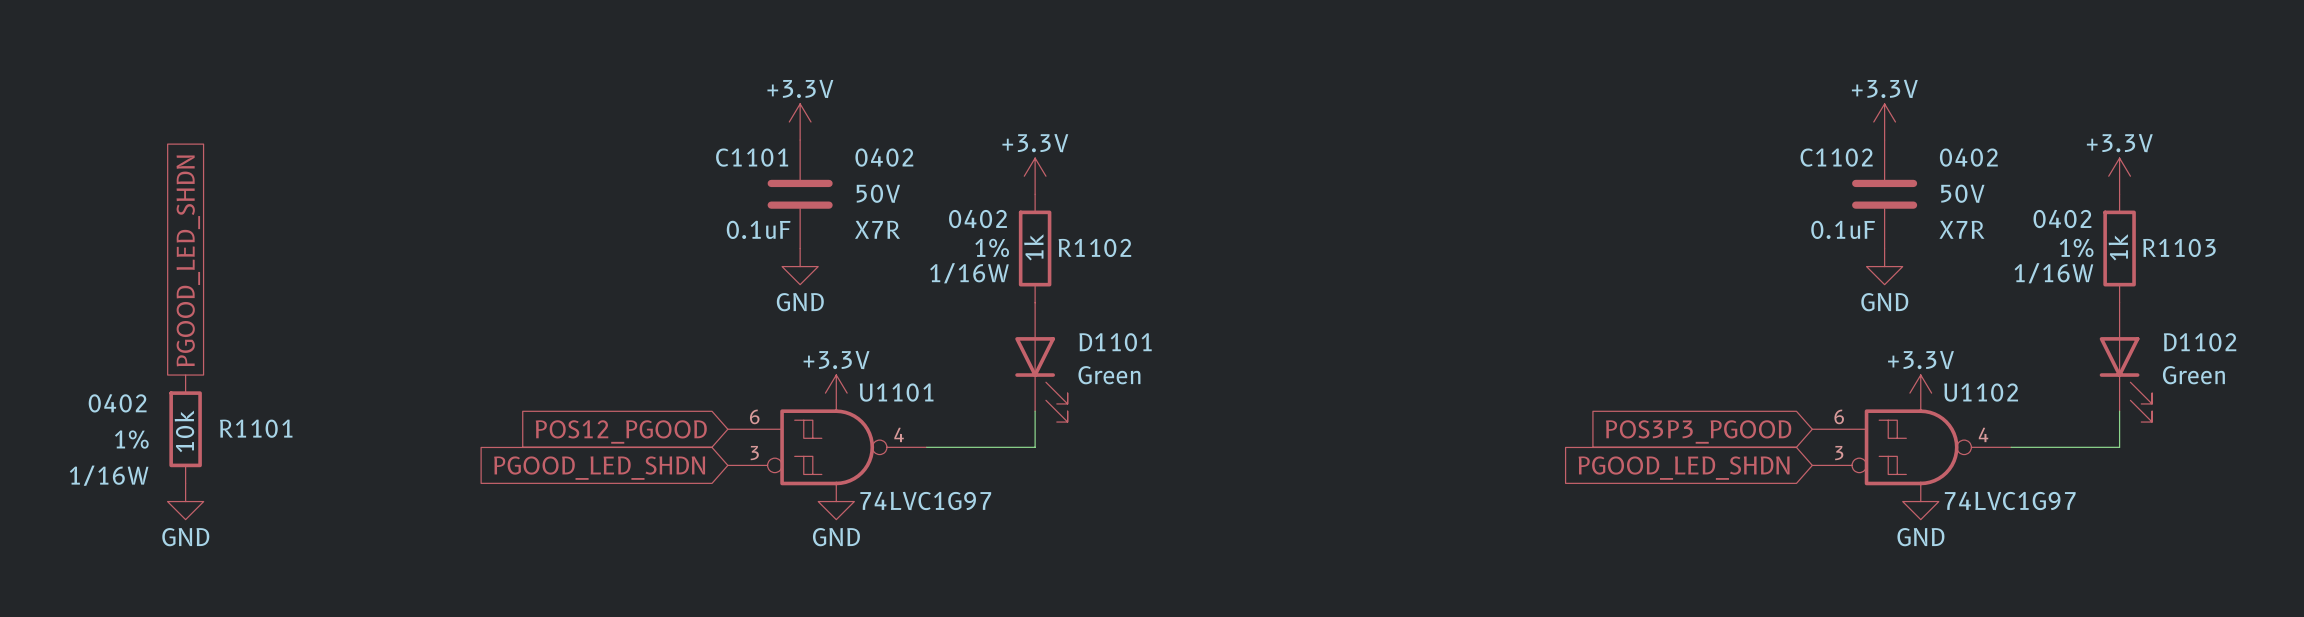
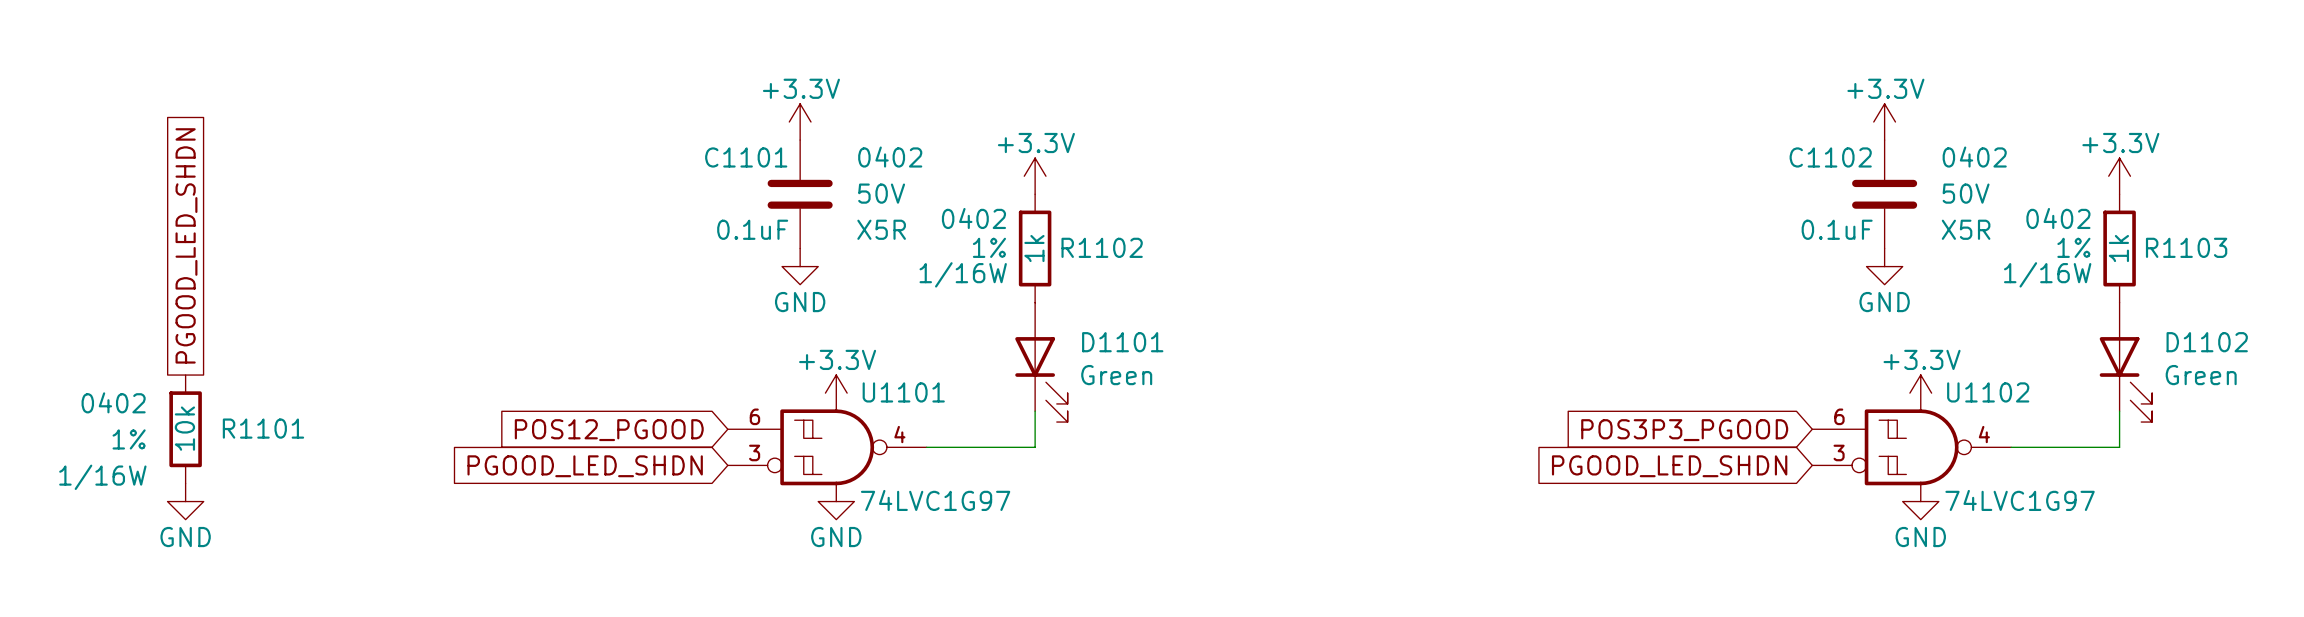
C1101 text: X7R (877, 229) -> X5R (881, 229)
C1102 text: X7R (1961, 229) -> X5R (1966, 229)

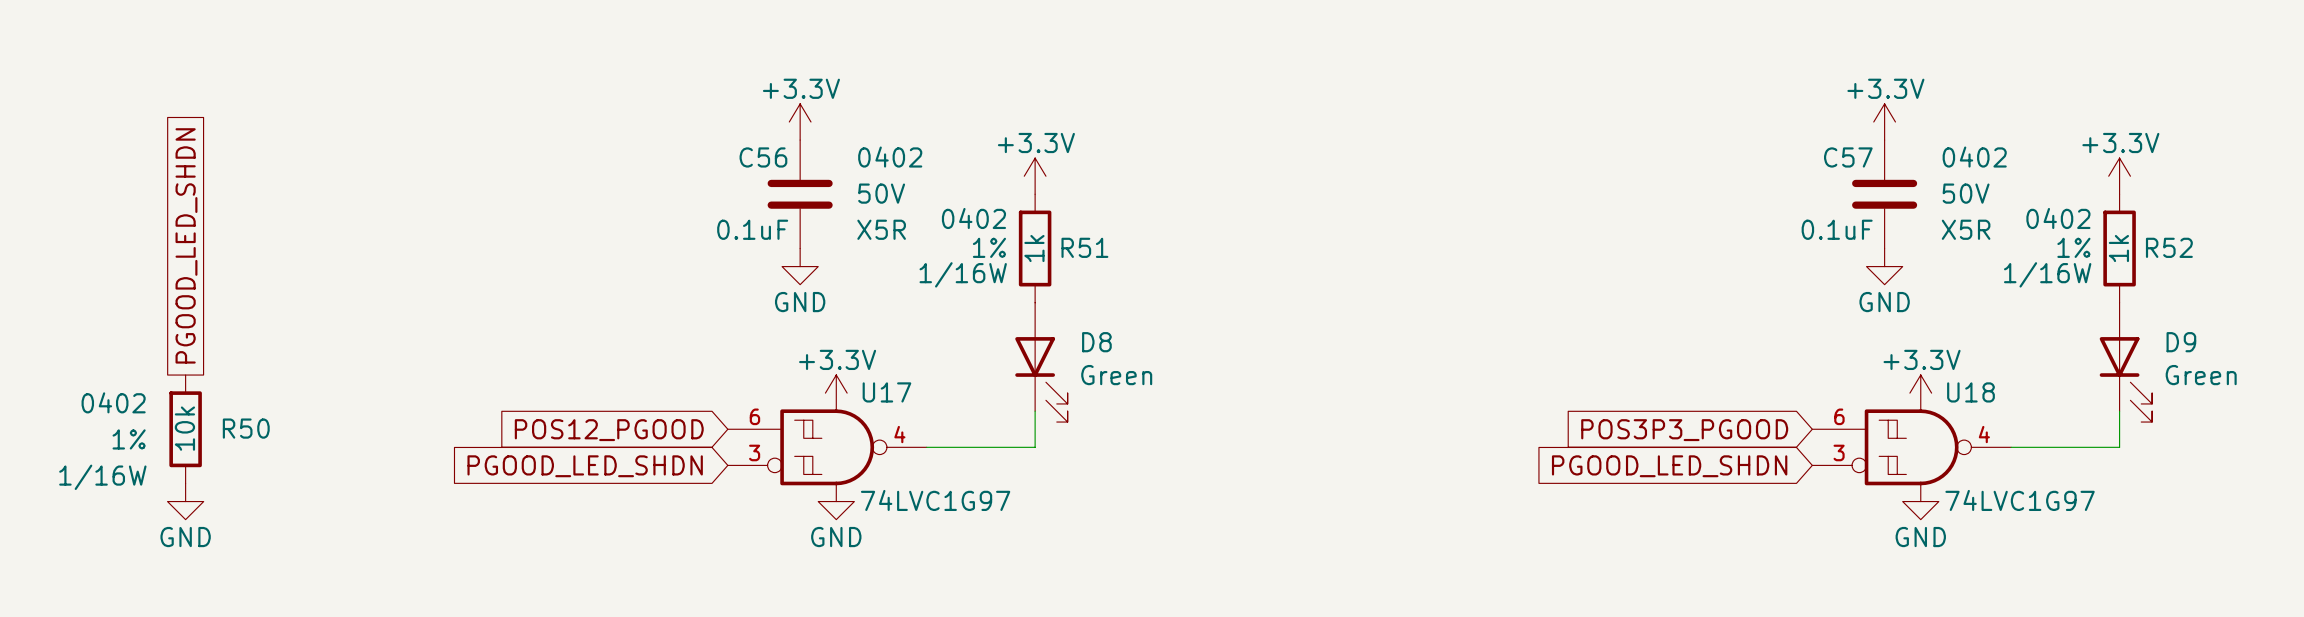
C1101 name: C1101 (746, 157) -> C56 (763, 157)
C1102 name: C1102 (1830, 157) -> C57 (1848, 157)
R1102 name: R1102 (1102, 247) -> R51 (1084, 247)
R1103 name: R1103 (2186, 247) -> R52 (2169, 247)
D1101 name: D1101 (1122, 342) -> D8 (1096, 342)
D1102 name: D1102 (2207, 342) -> D9 (2181, 342)
U1101 name: U1101 (903, 392) -> U17 (886, 392)
U1102 name: U1102 (1988, 392) -> U18 (1970, 392)
R1101 name: R1101 (263, 428) -> R50 (246, 428)

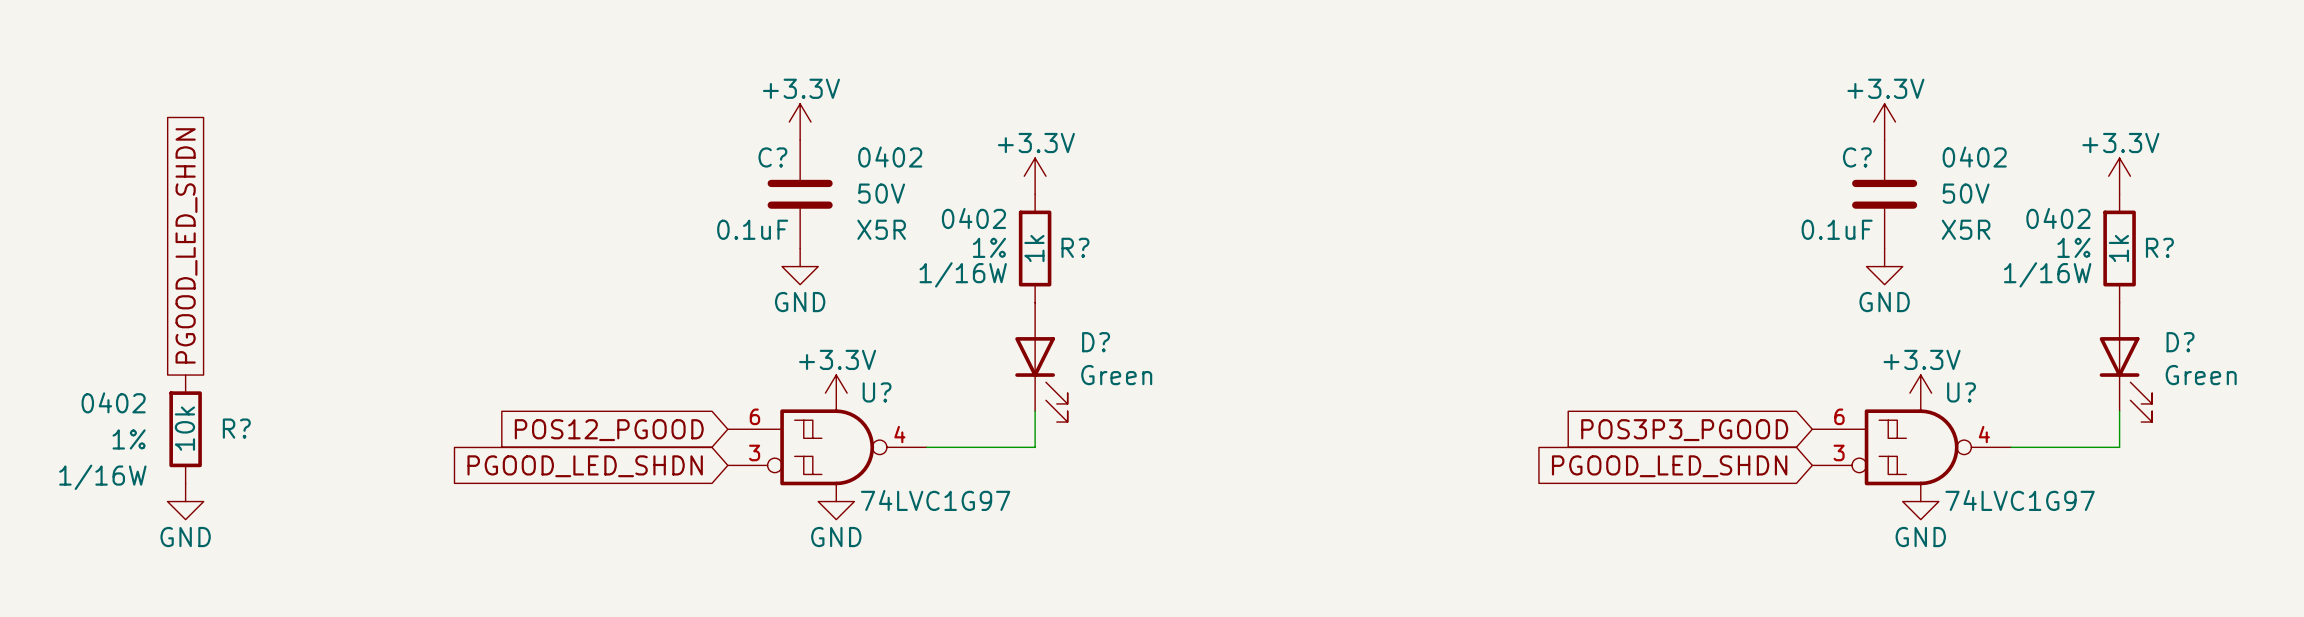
C56 name: C56 (763, 157) -> C? (772, 157)
C57 name: C57 (1848, 157) -> C? (1857, 157)
R51 name: R51 (1084, 247) -> R? (1075, 247)
R52 name: R52 (2169, 247) -> R? (2159, 247)
D8 name: D8 (1096, 342) -> D? (1096, 342)
D9 name: D9 (2181, 342) -> D? (2180, 342)
U17 name: U17 (886, 392) -> U? (877, 392)
U18 name: U18 (1970, 392) -> U? (1961, 392)
R50 name: R50 (246, 428) -> R? (236, 428)

